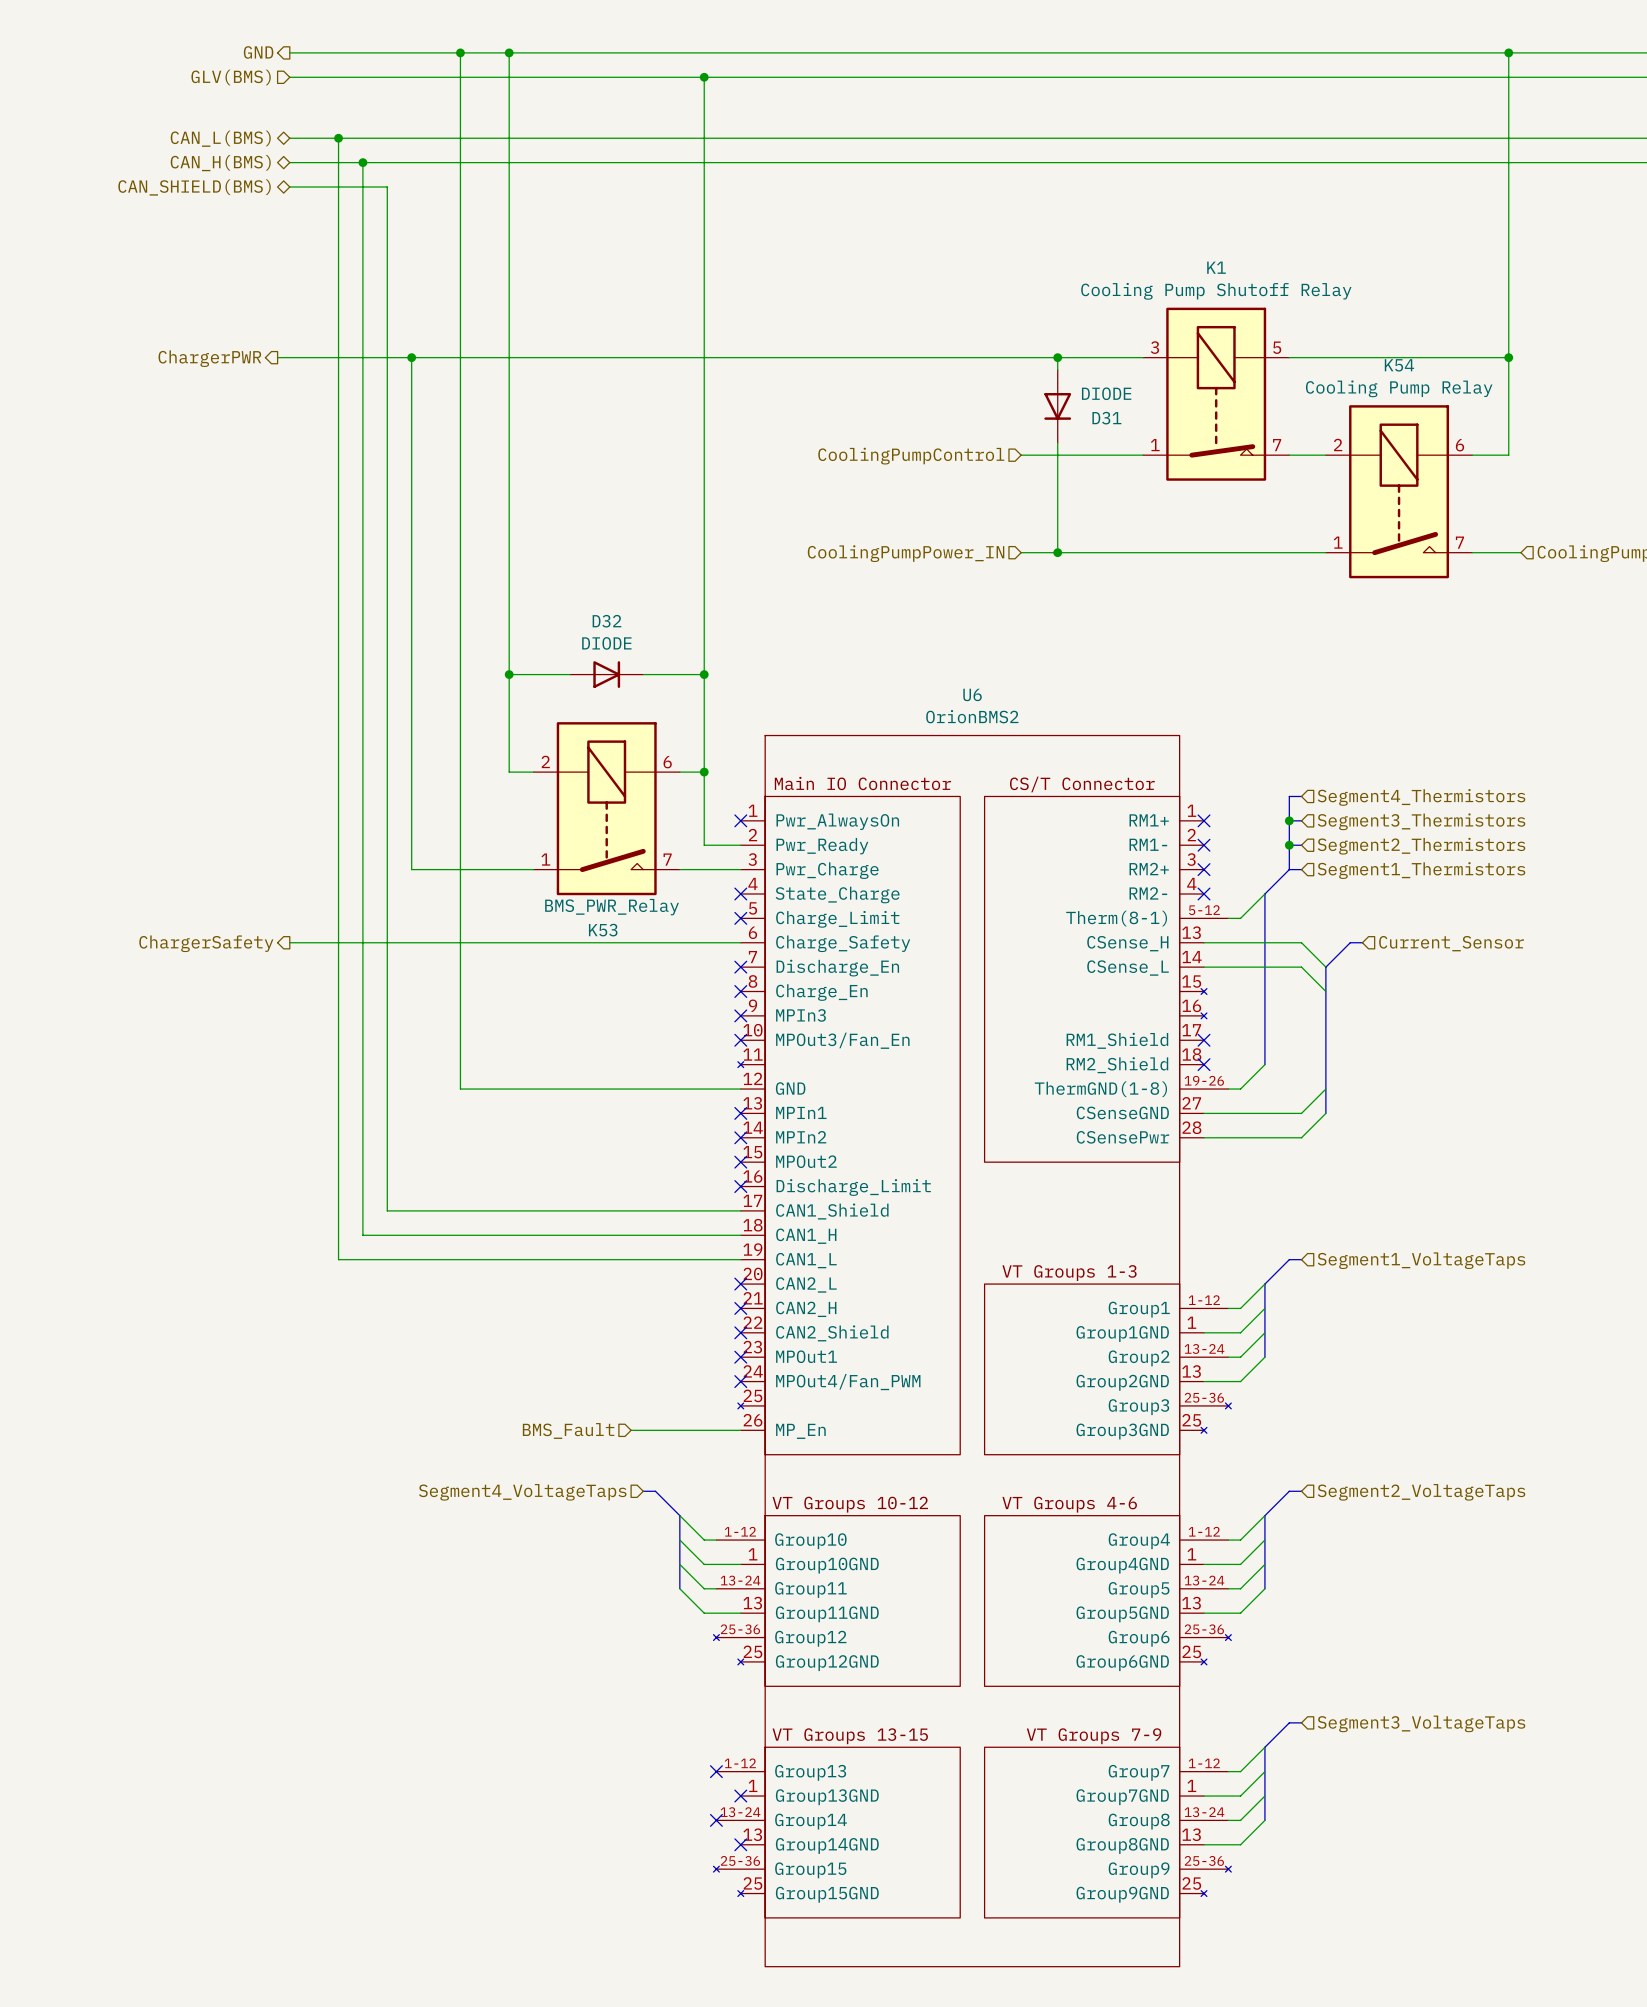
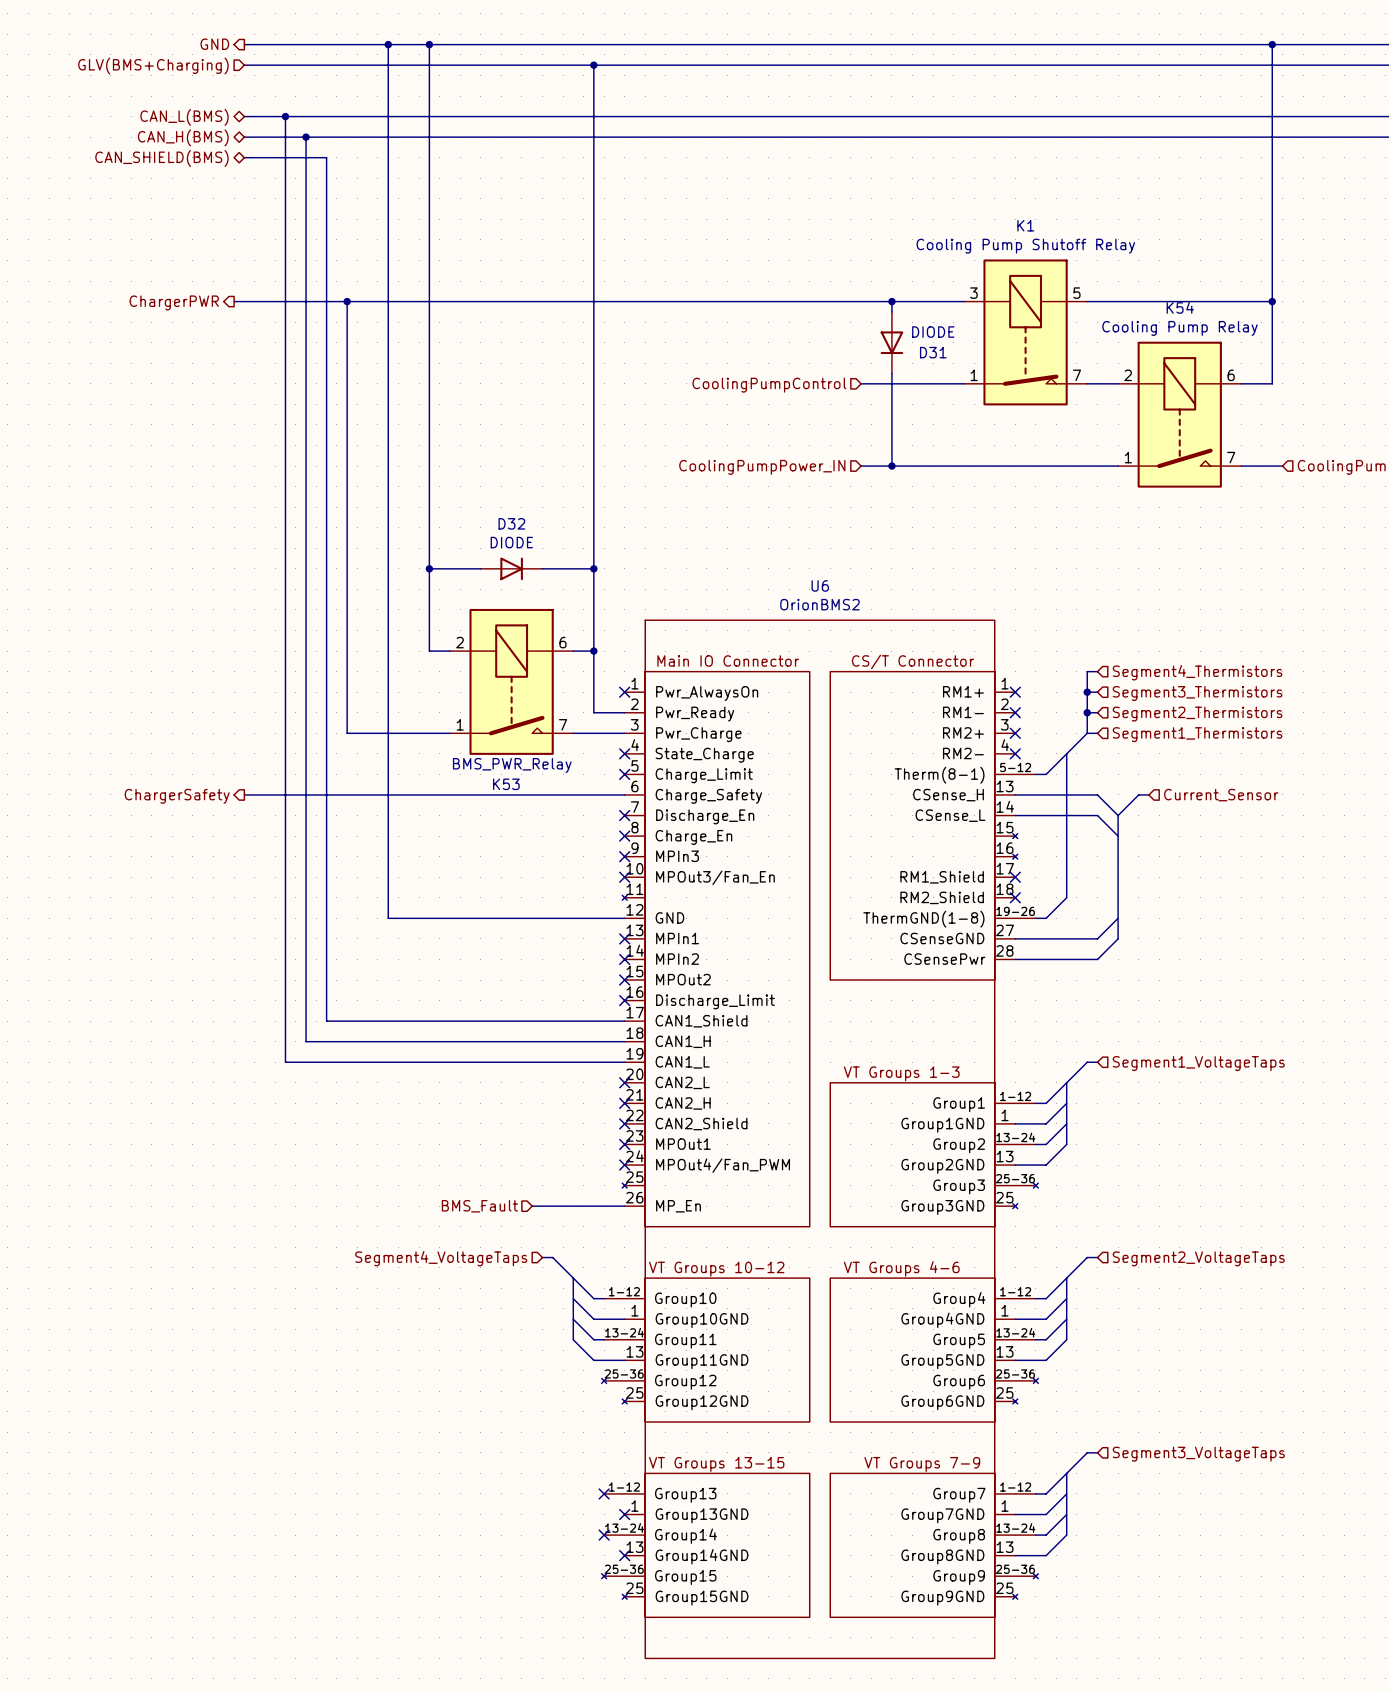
hierarchical label: GLV(BMS) (231, 77) -> GLV(BMS+Charging) (153, 66)

